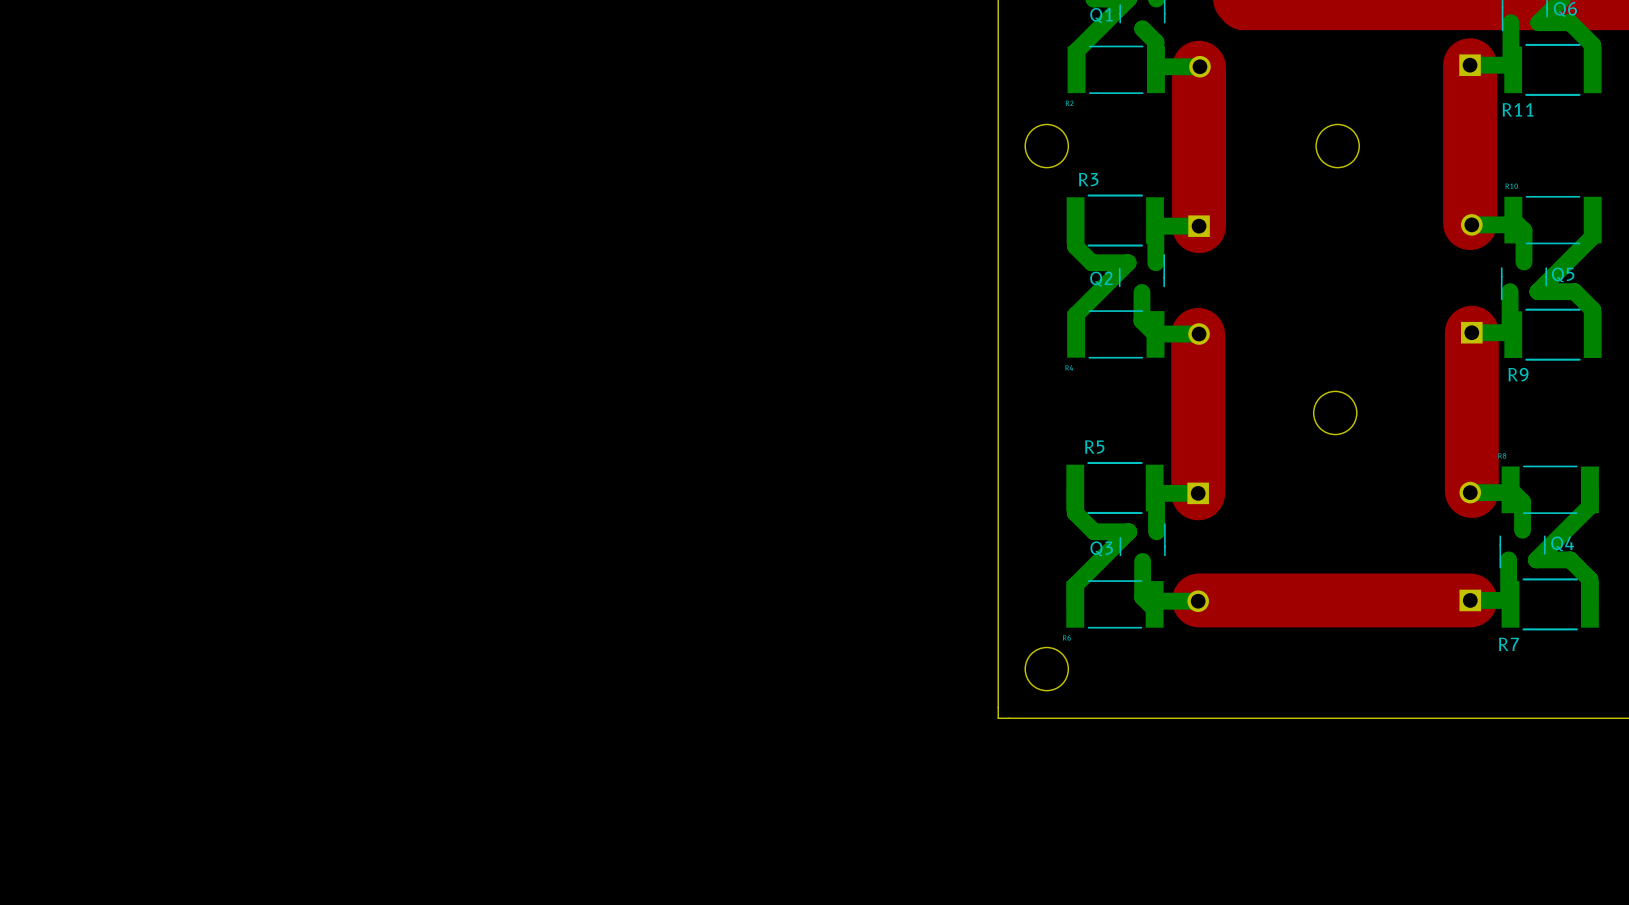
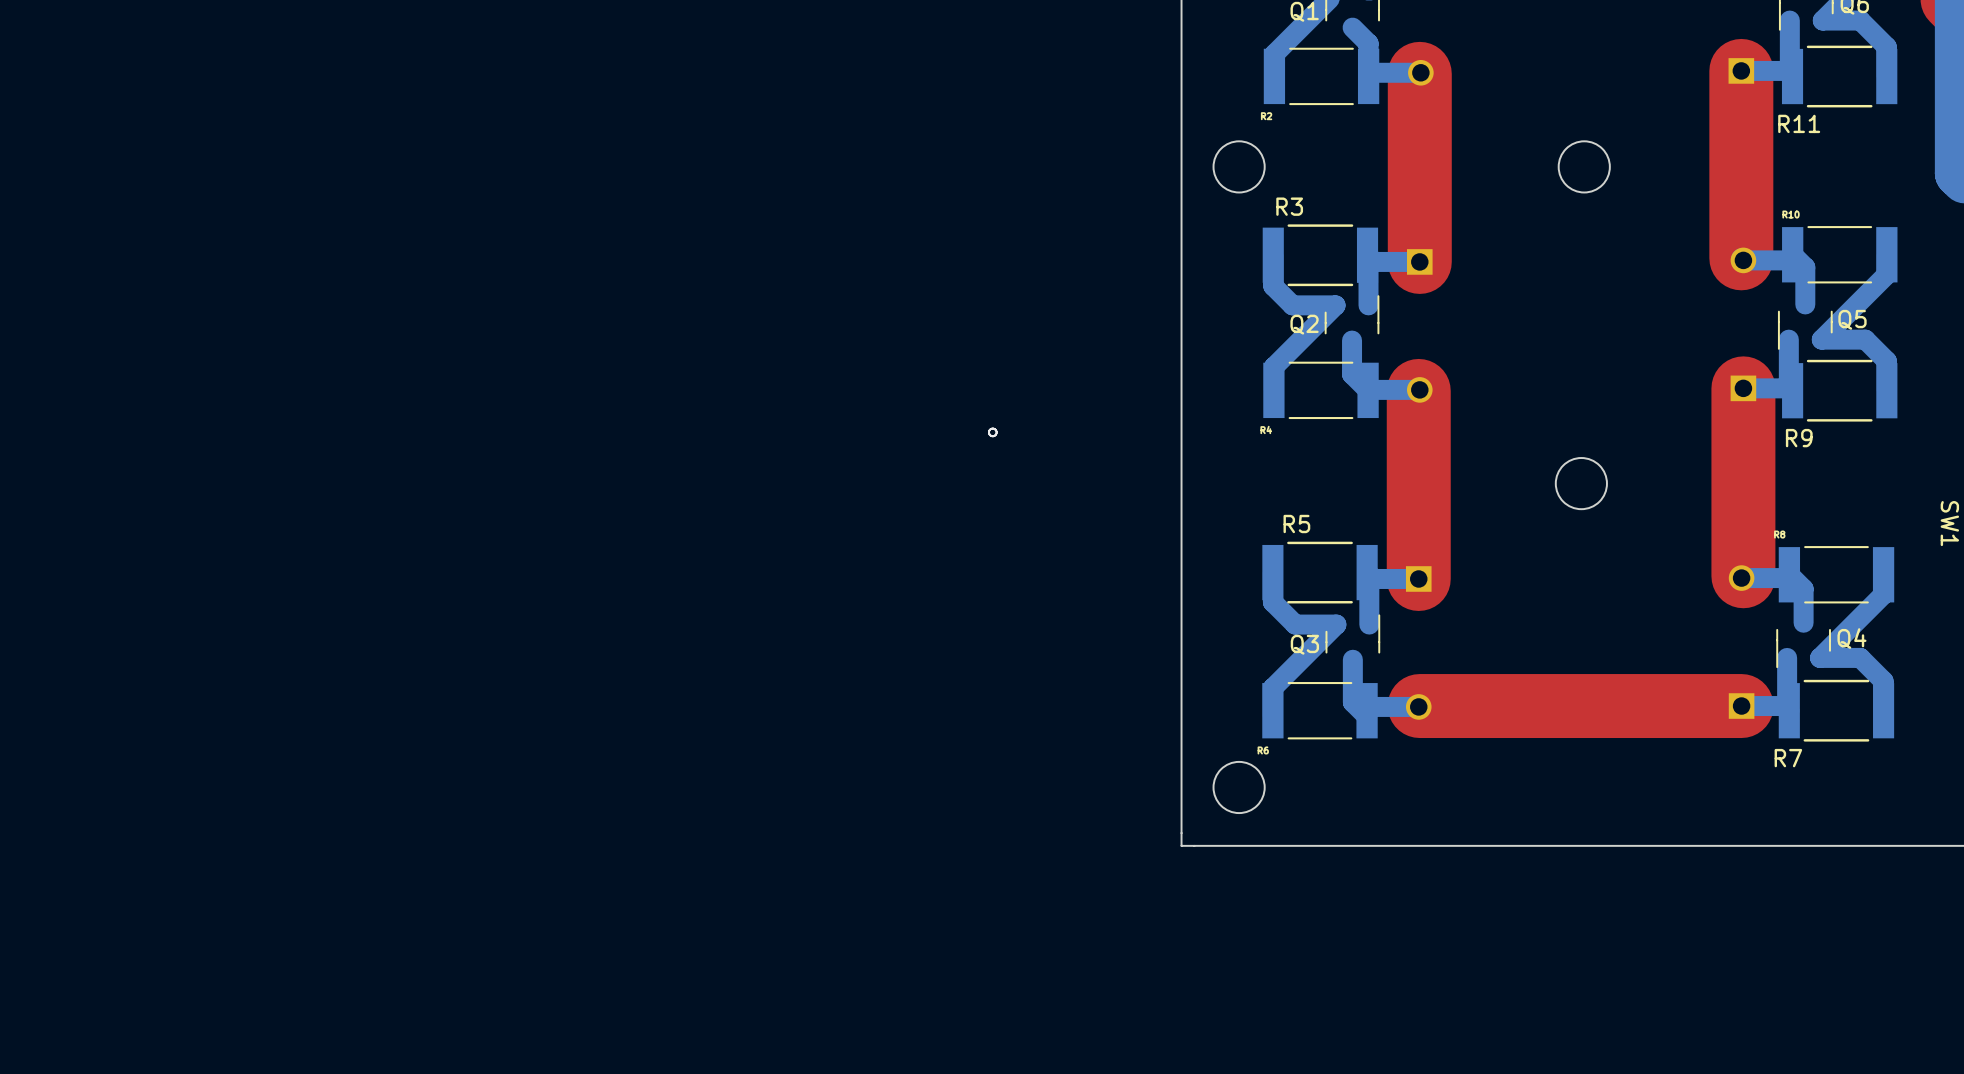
via: none -> (992, 432)

